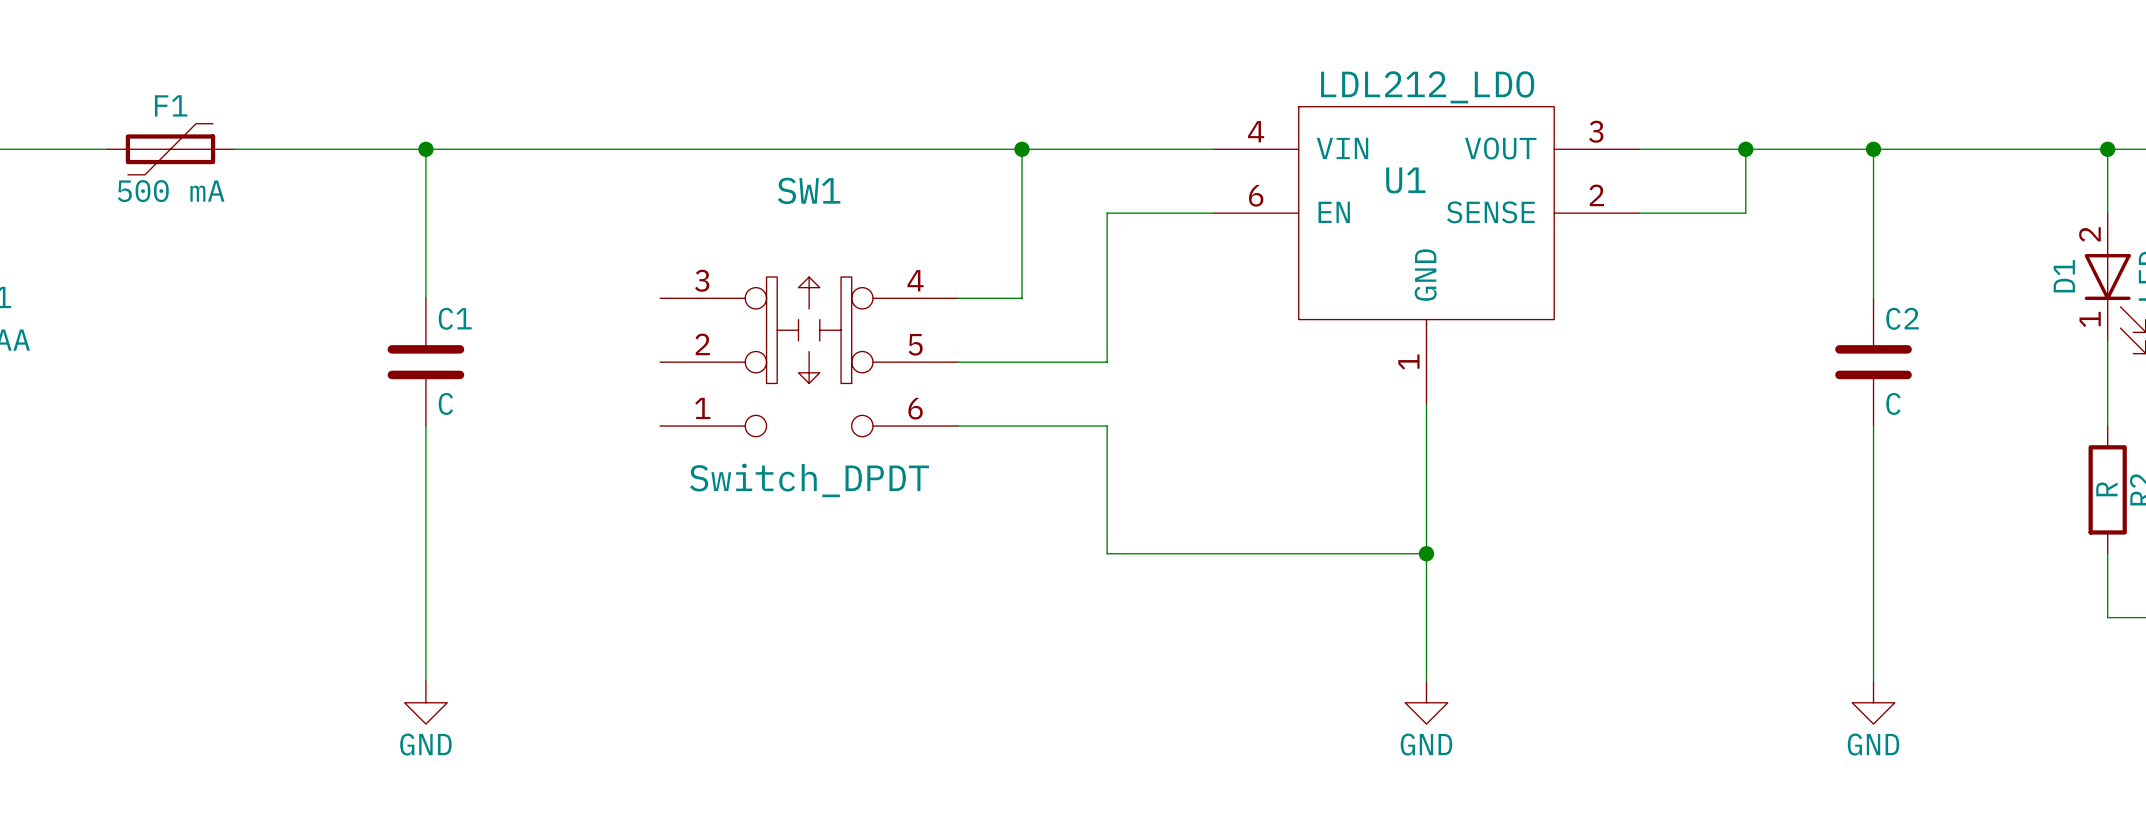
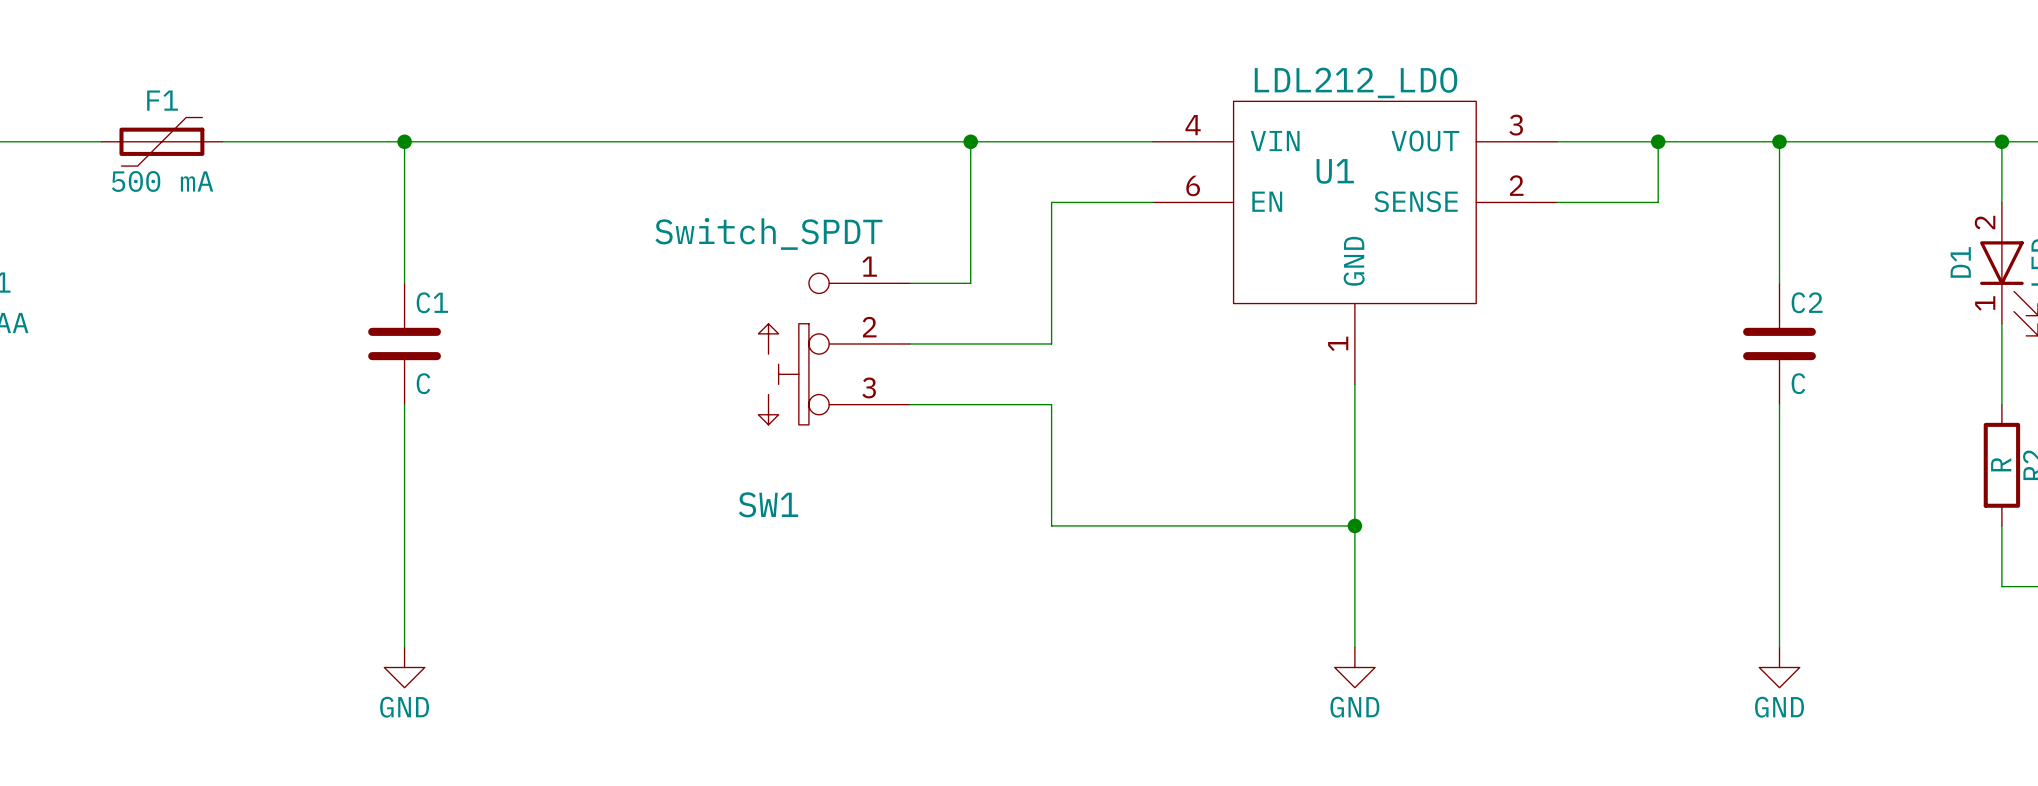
SW1 name position: SW1 (809, 190) -> SW1 (768, 504)
SW1 symbol: [660, 277, 959, 437] -> [758, 273, 911, 425]
SW1 value: Switch_DPDT (809, 480) -> Switch_SPDT (768, 233)

